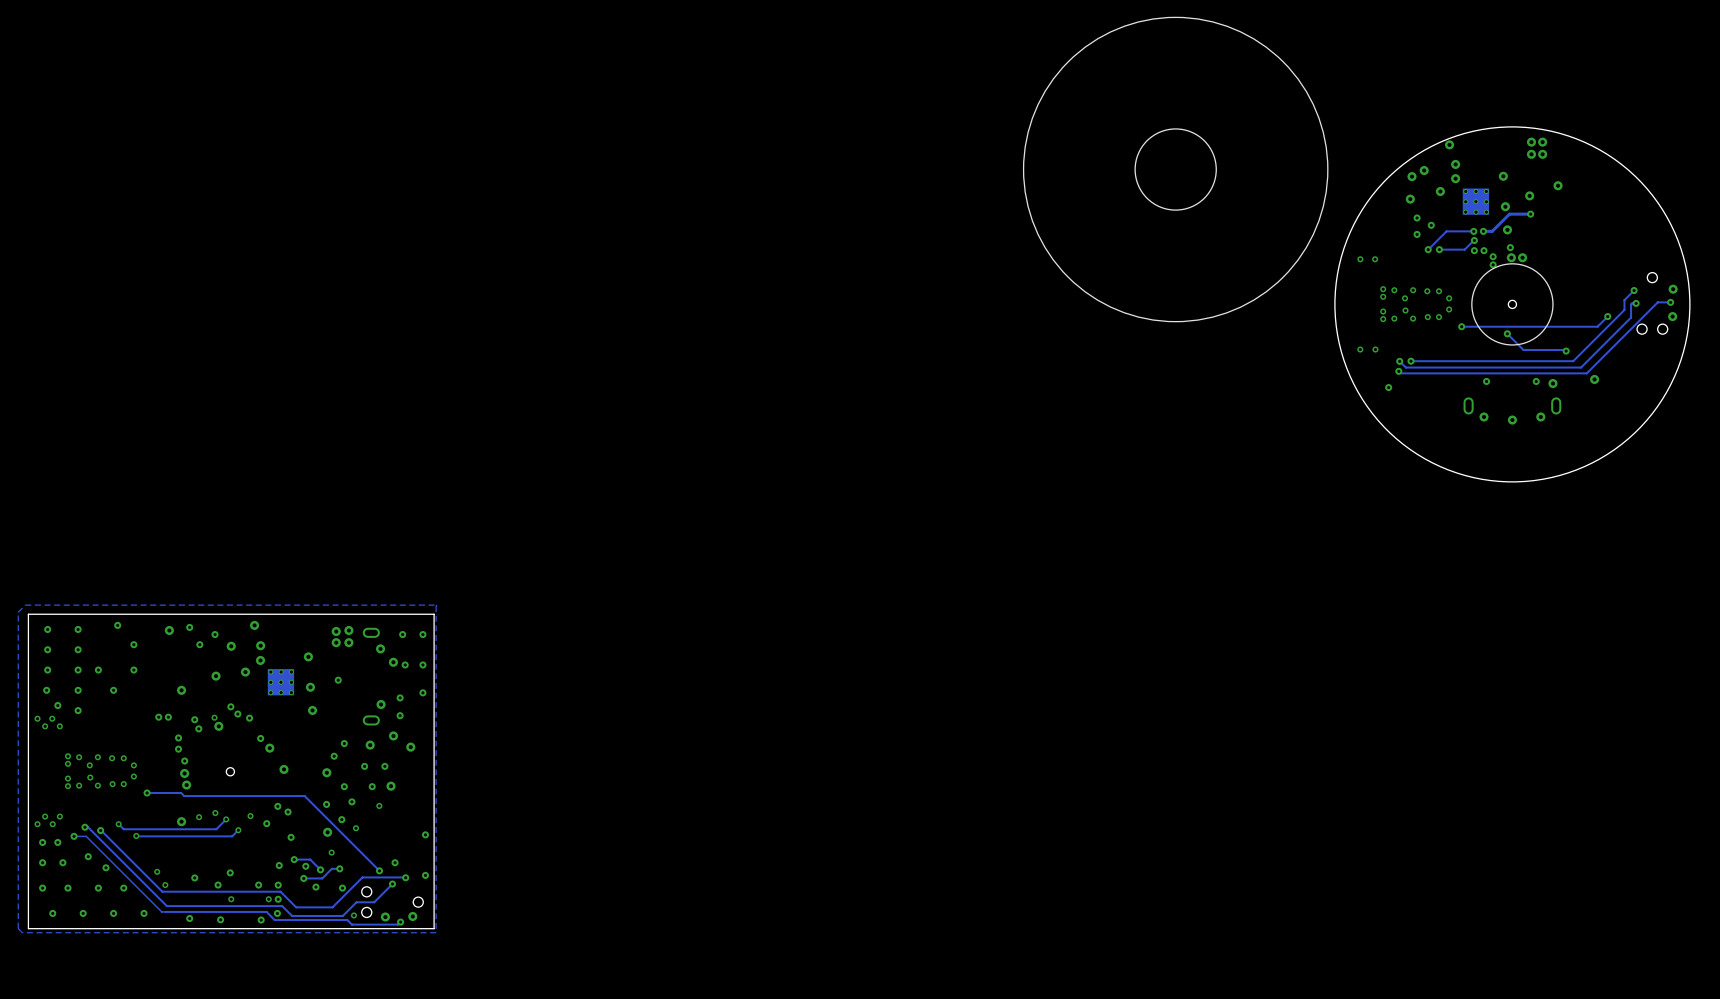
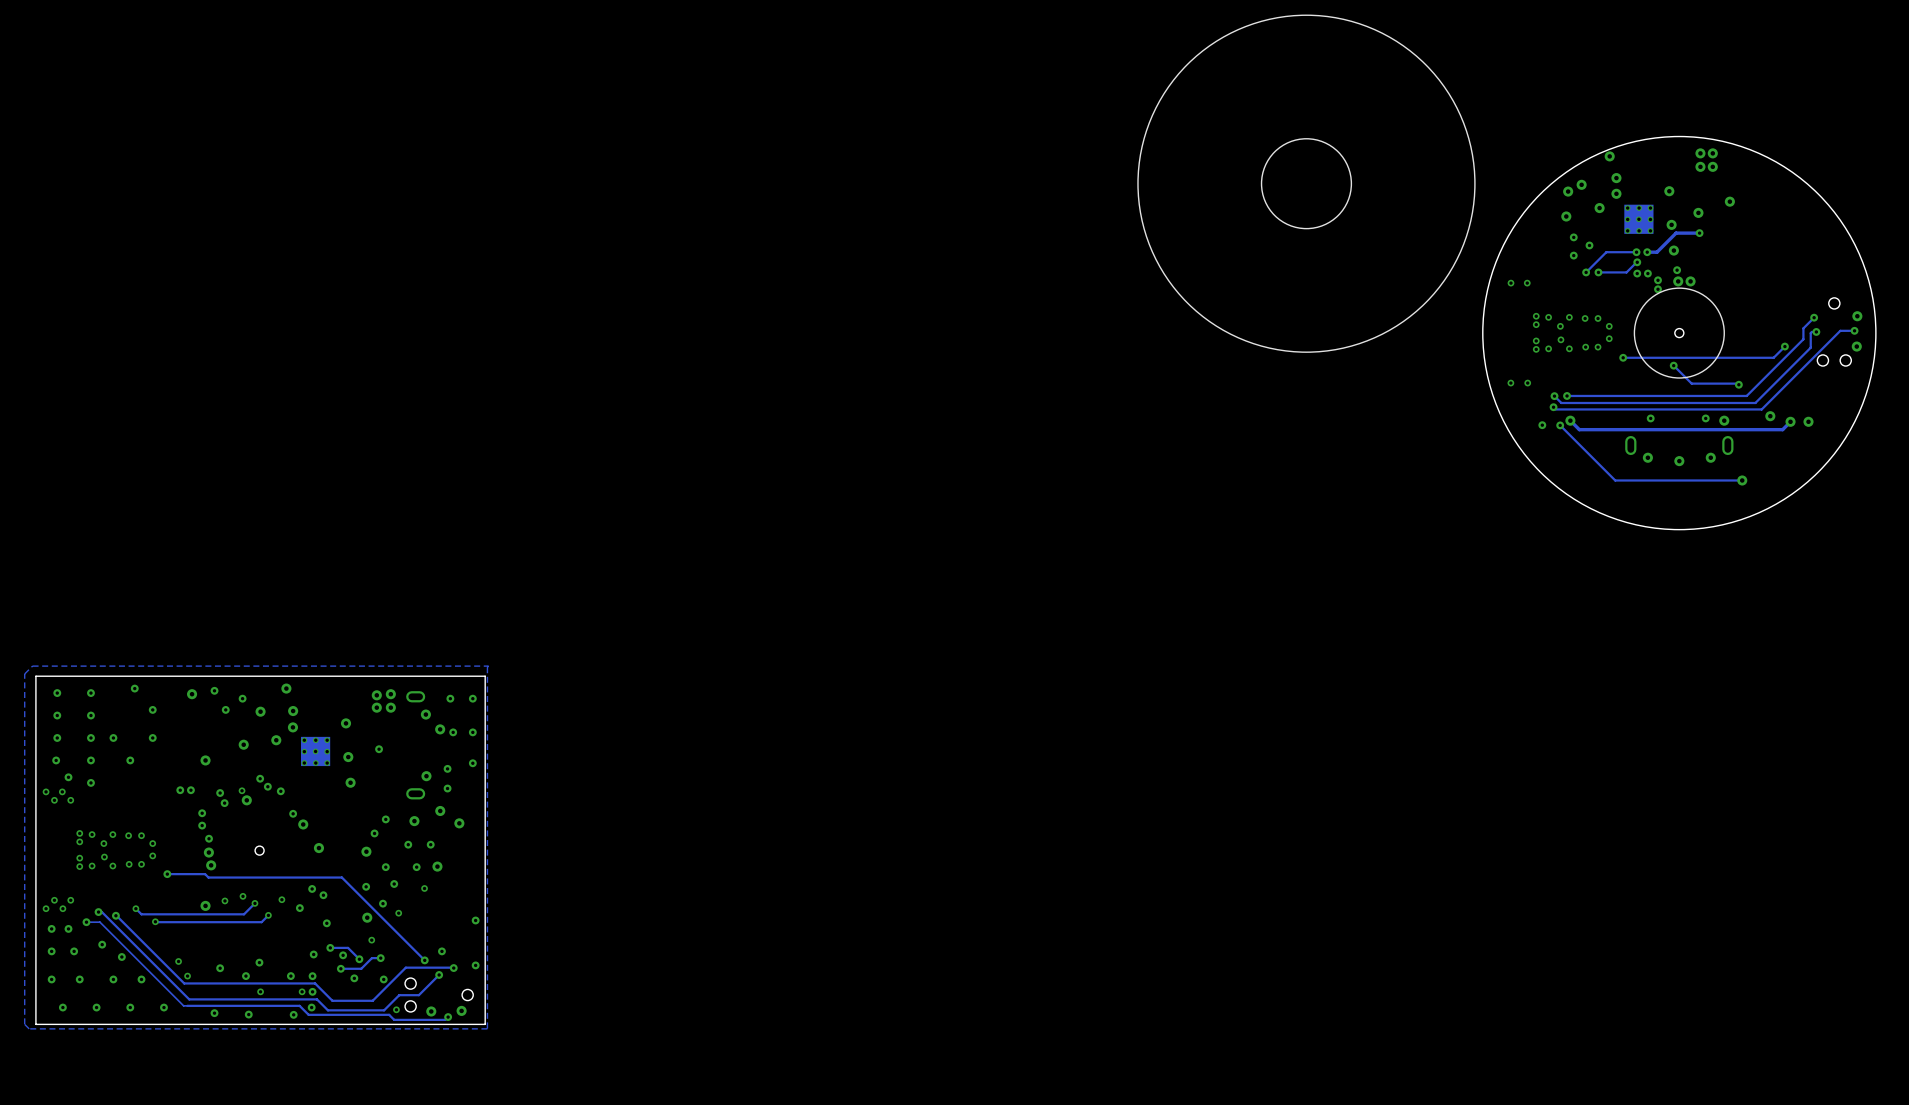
track: none -> (1570, 420) (1579, 429) (1782, 429) (1790, 421)
via: none -> (1570, 420)
via: none -> (1790, 421)
via: none -> (1808, 421)
track: none -> (1560, 425) (1615, 480) (1742, 480)
via: none -> (1560, 425)
via: none -> (1742, 480)

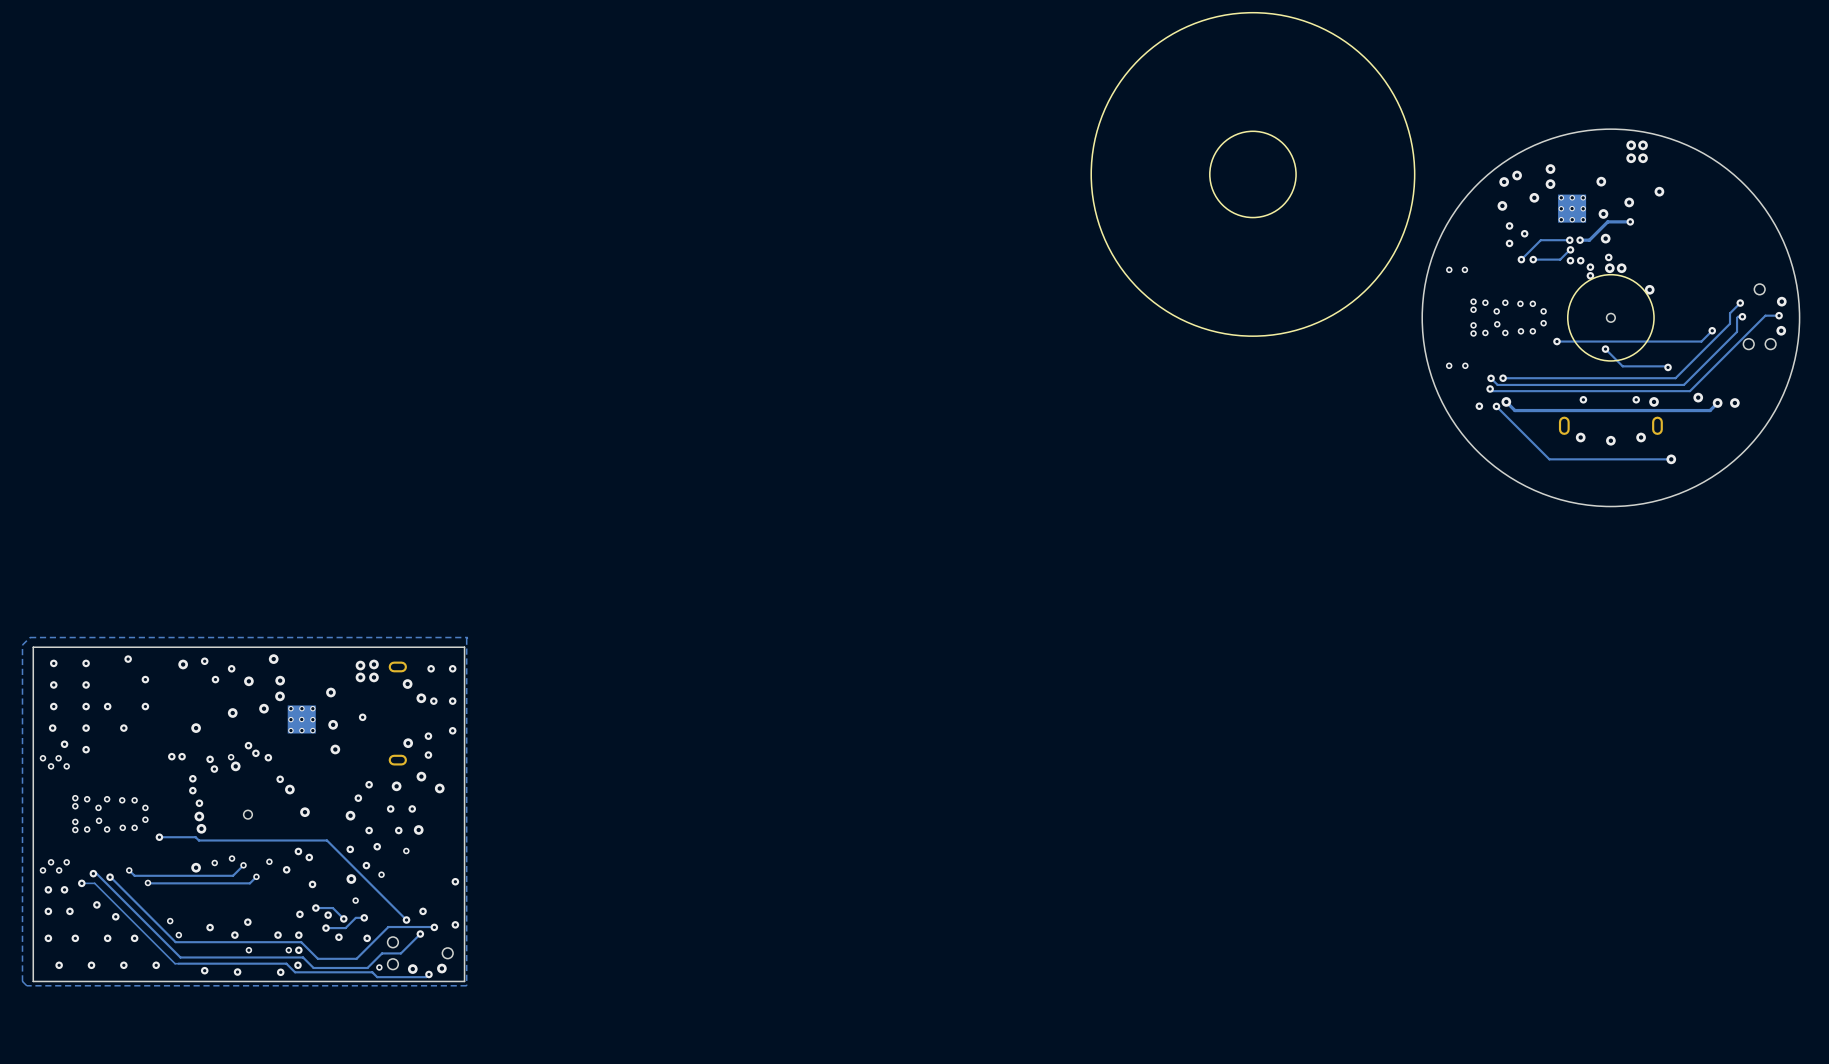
via: (1609, 156) -> none
via: none -> (1649, 289)

